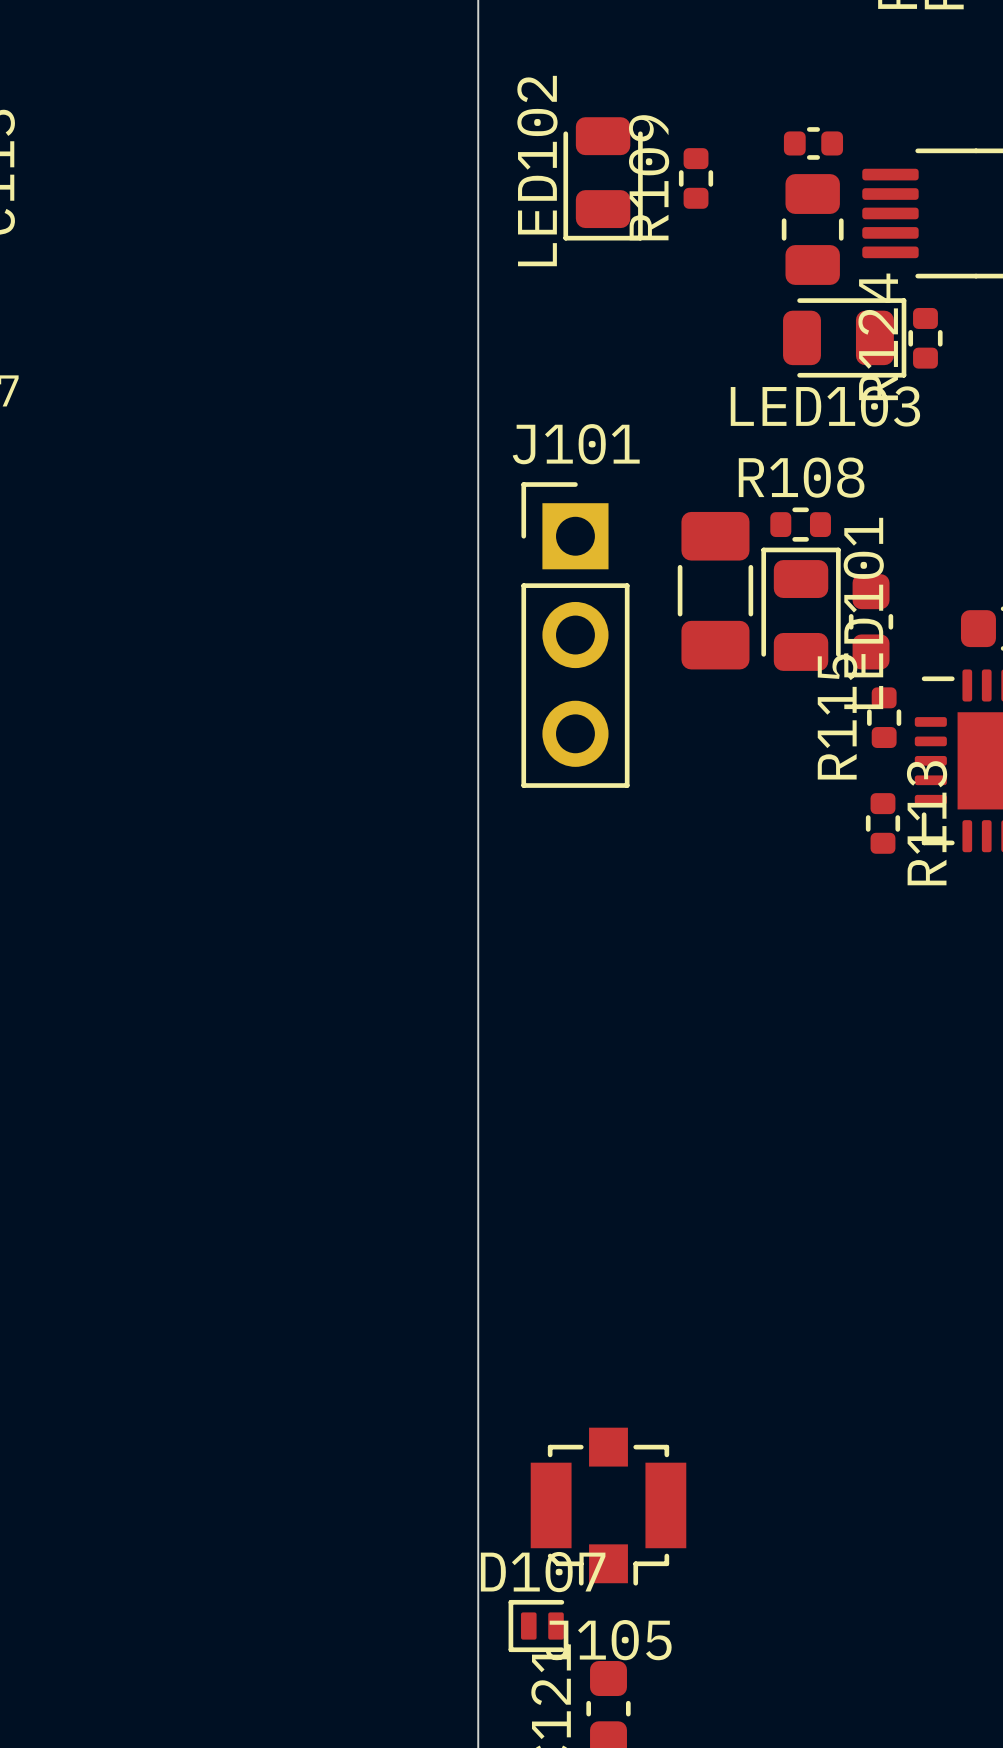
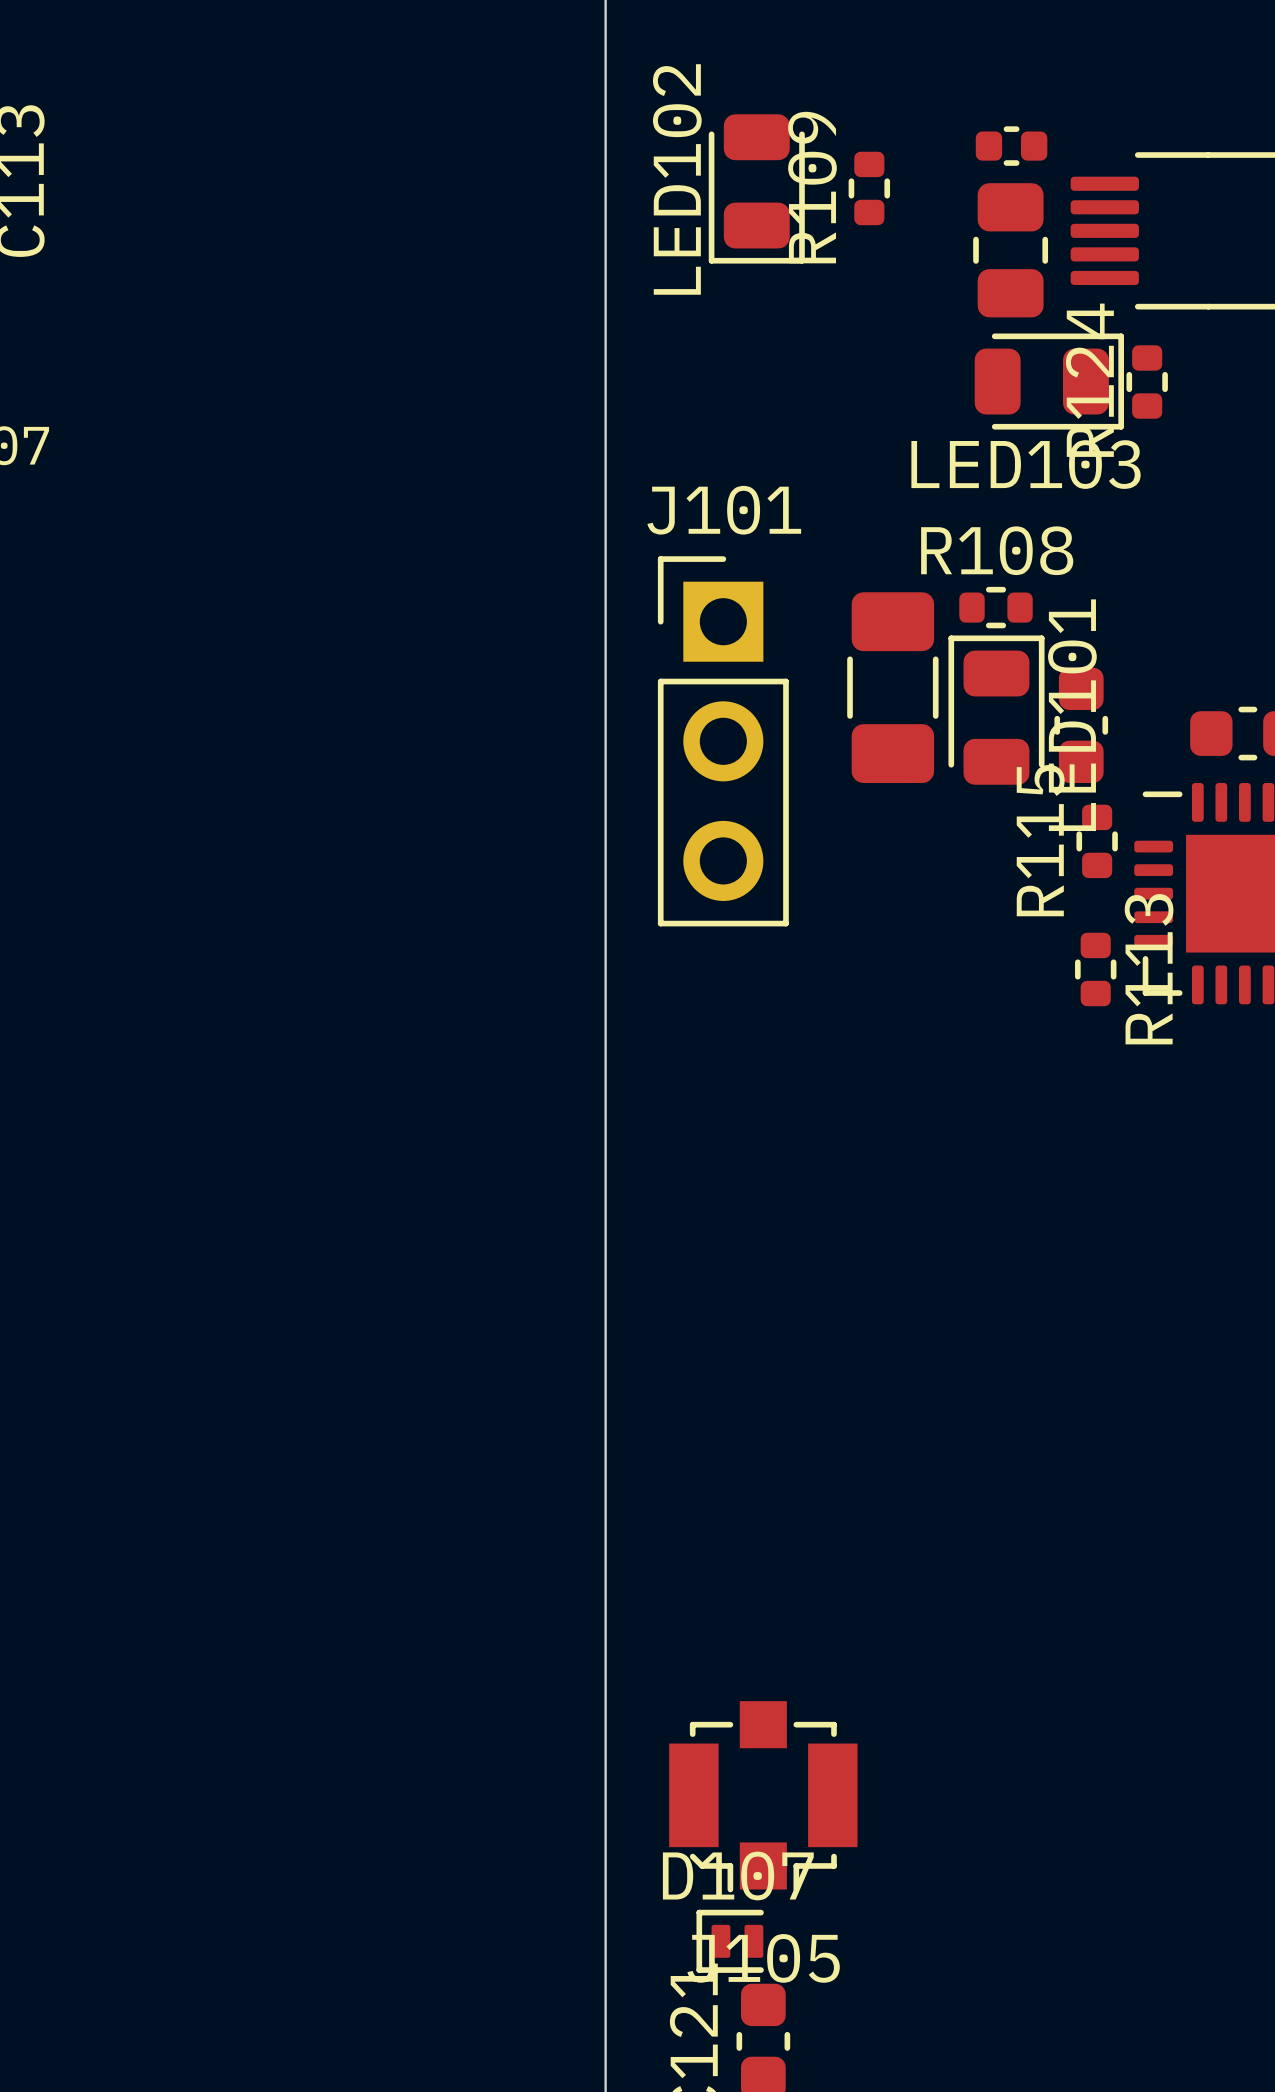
D107 position: (536, 1626) -> (730, 1941)

